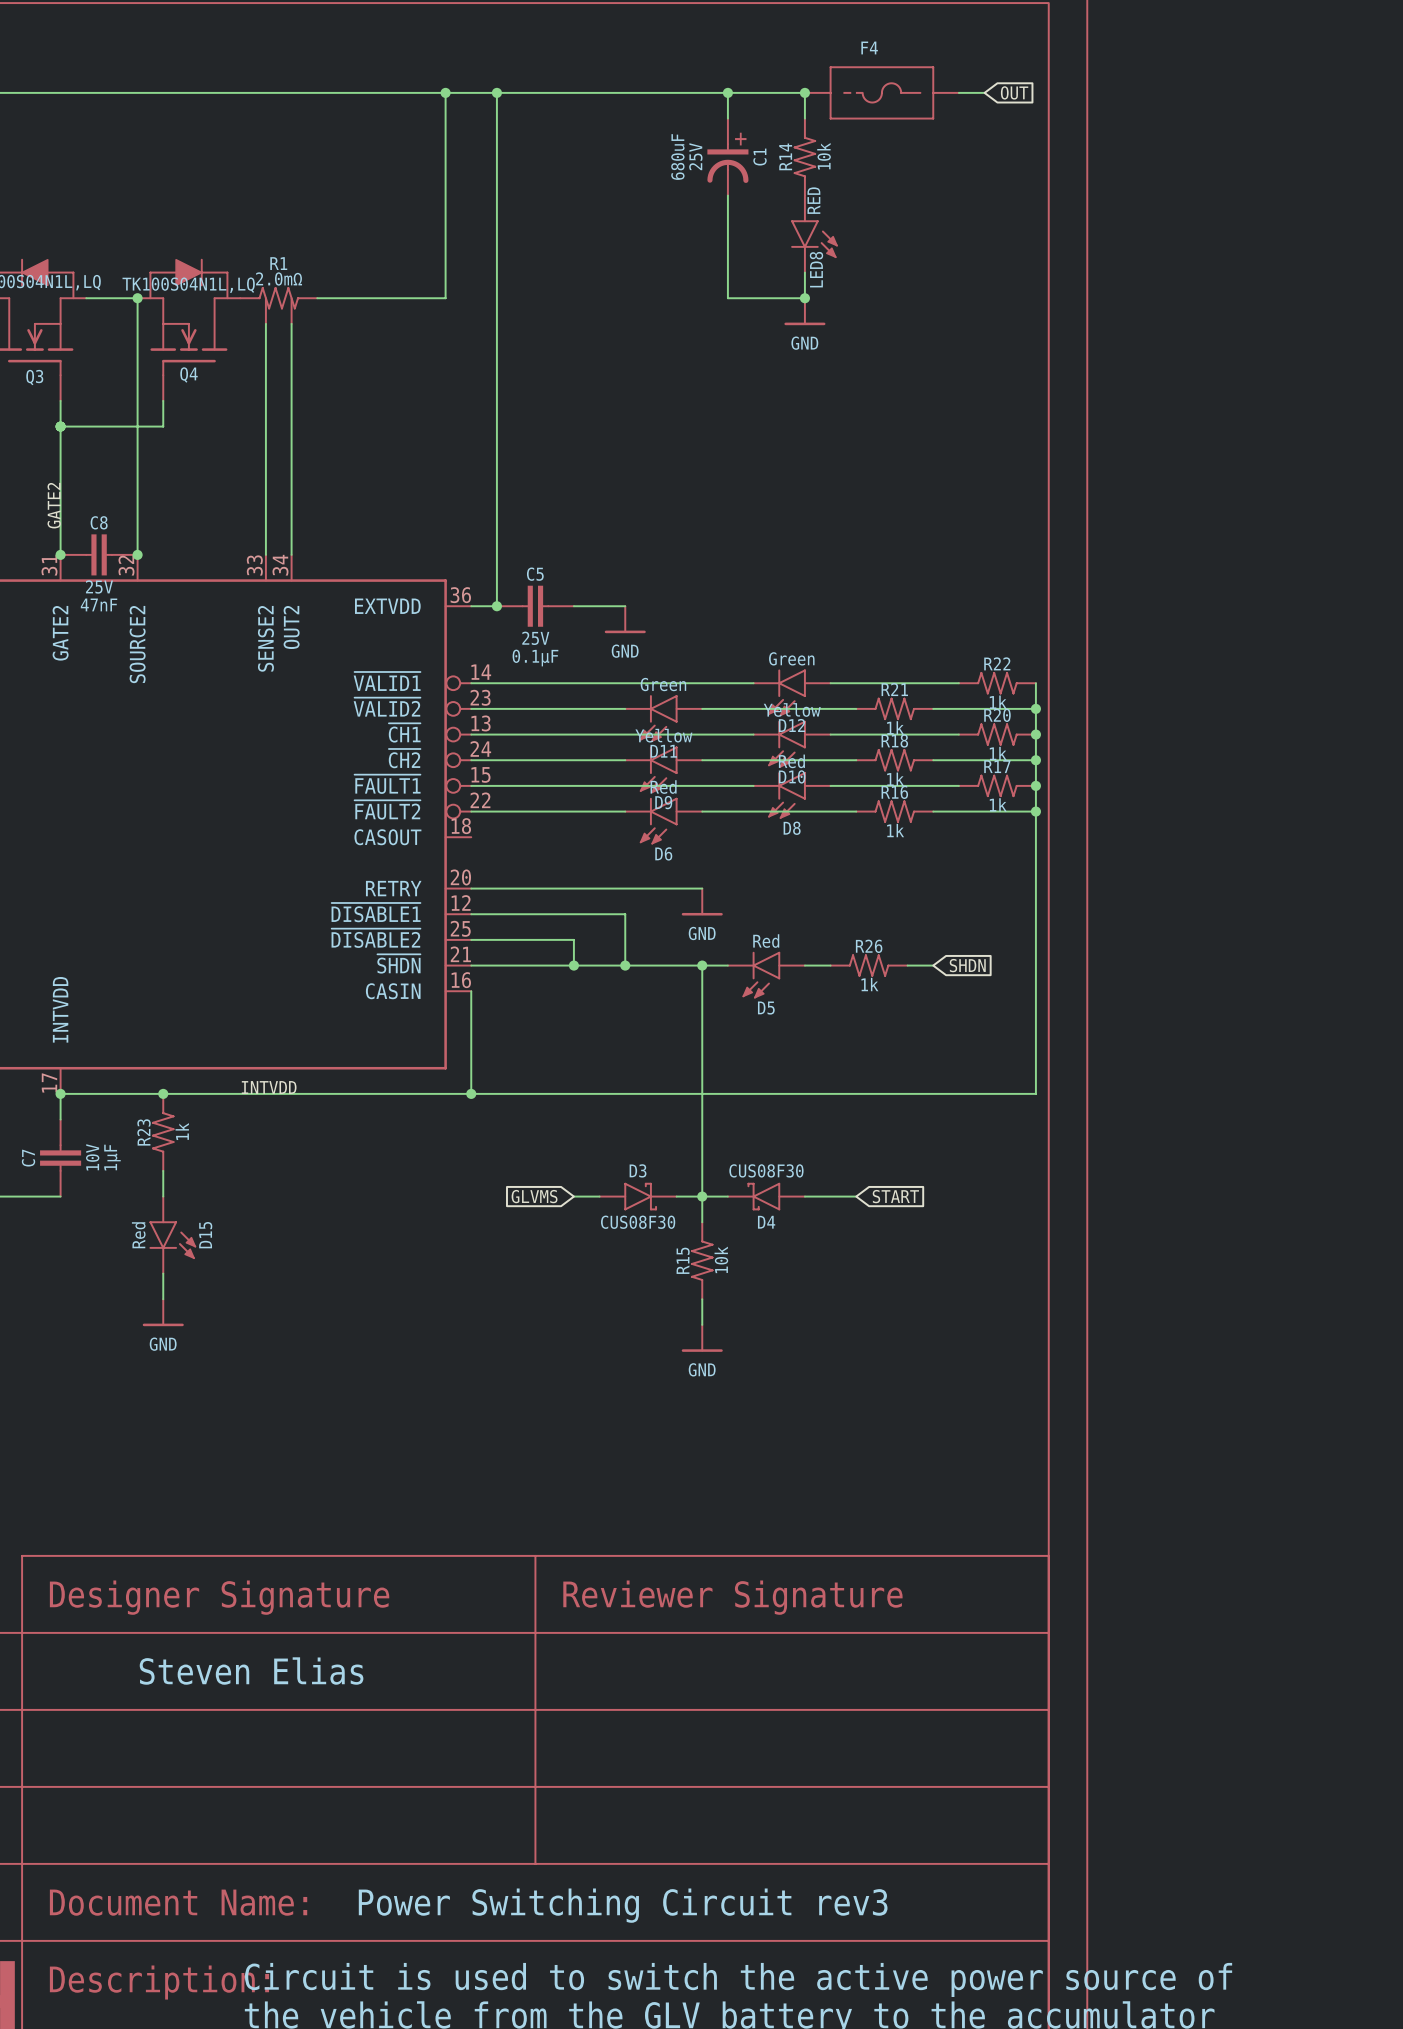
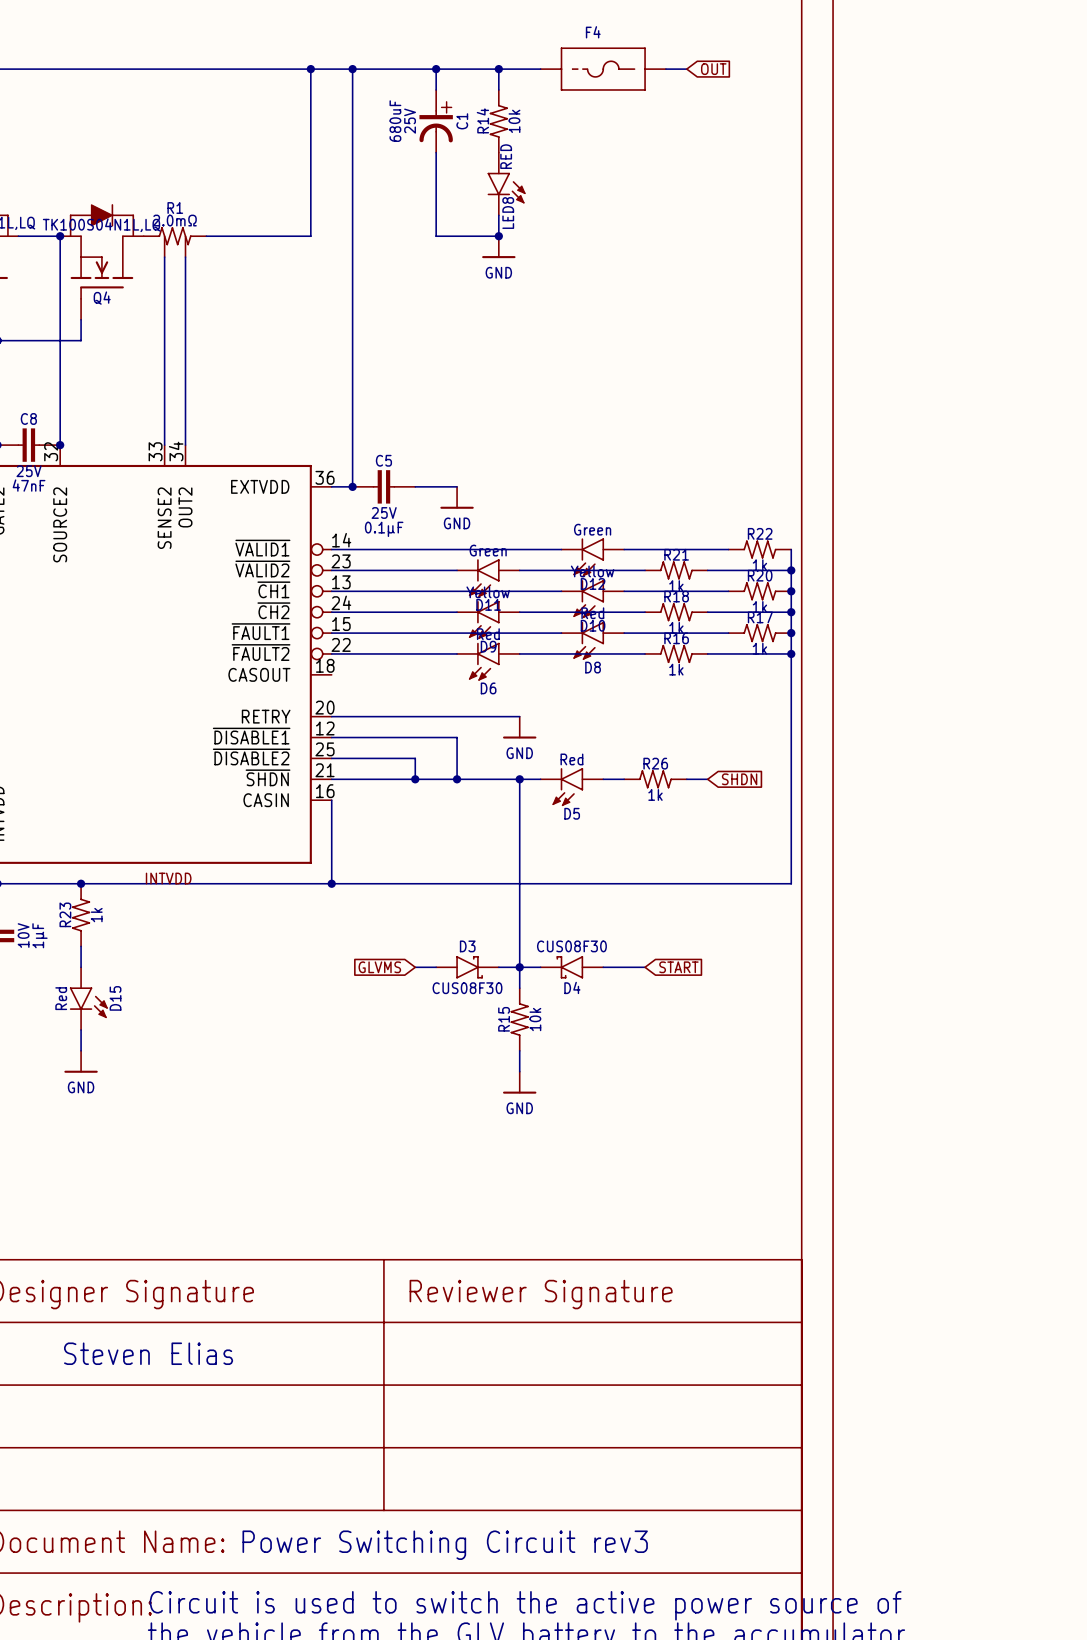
wire: none -> (436, 69) (436, 89)
junction: none -> (436, 69)
wire: none -> (498, 69) (498, 89)
junction position: (727, 92) -> (498, 69)
junction: (804, 92) -> none
F4 position: (881, 92) -> (603, 69)
wire: (958, 92) (984, 92) -> (665, 69) (686, 69)
global label position: OUT (1014, 92) -> OUT (713, 69)
wire: (727, 118) (727, 92) (804, 92) (804, 118) -> none
C1 position: (727, 157) -> (436, 121)
R14 position: (804, 157) -> (498, 121)
wire: (727, 195) (727, 298) (804, 298) (804, 272) -> (436, 152) (436, 236) (498, 236) (498, 215)
LED8 position: (814, 234) -> (506, 183)
junction: none -> (498, 236)
junction: (804, 298) -> none
power symbol position: GND (804, 311) -> GND (498, 247)

